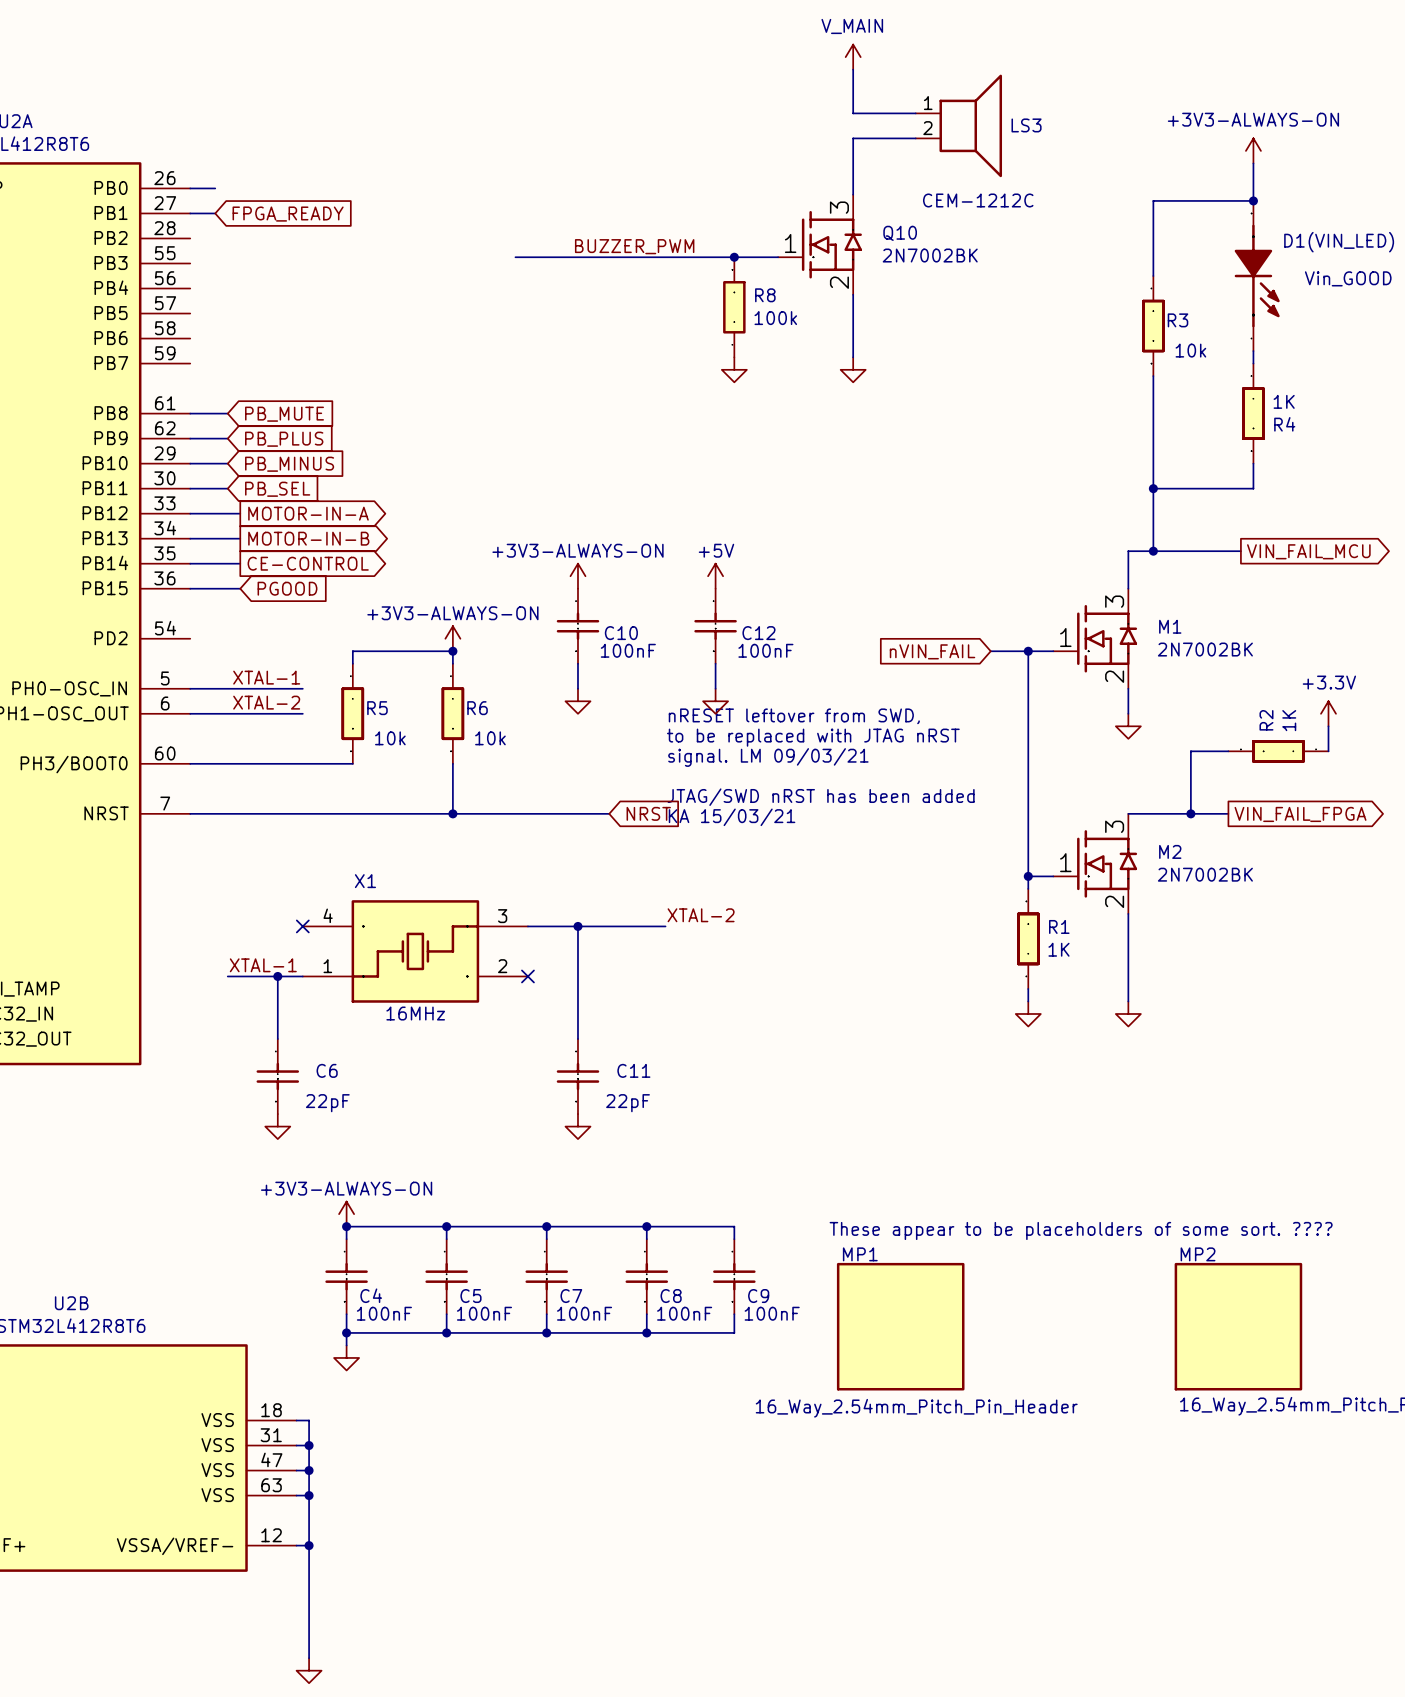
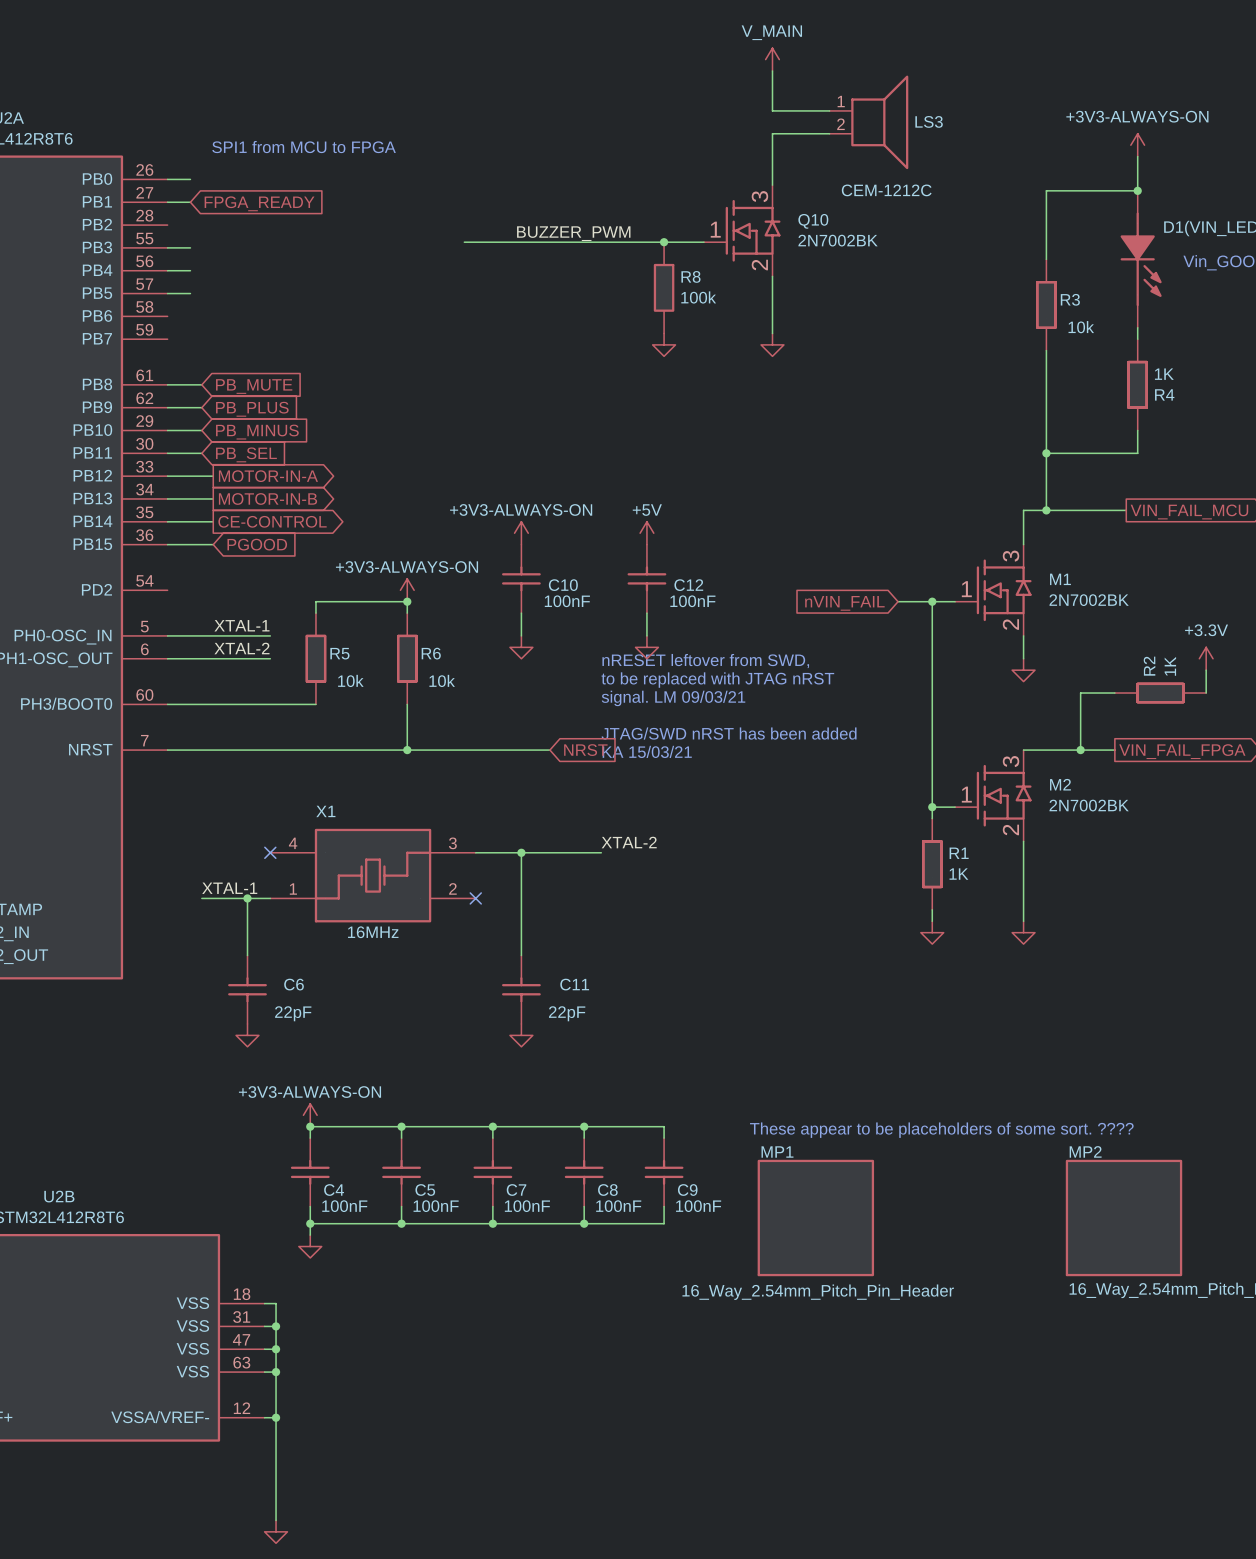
text: none -> SPI1 from MCU to FPGA (304, 147)
wire: none -> (167, 247) (190, 247)
wire: none -> (167, 270) (190, 270)
wire: none -> (167, 293) (190, 293)

